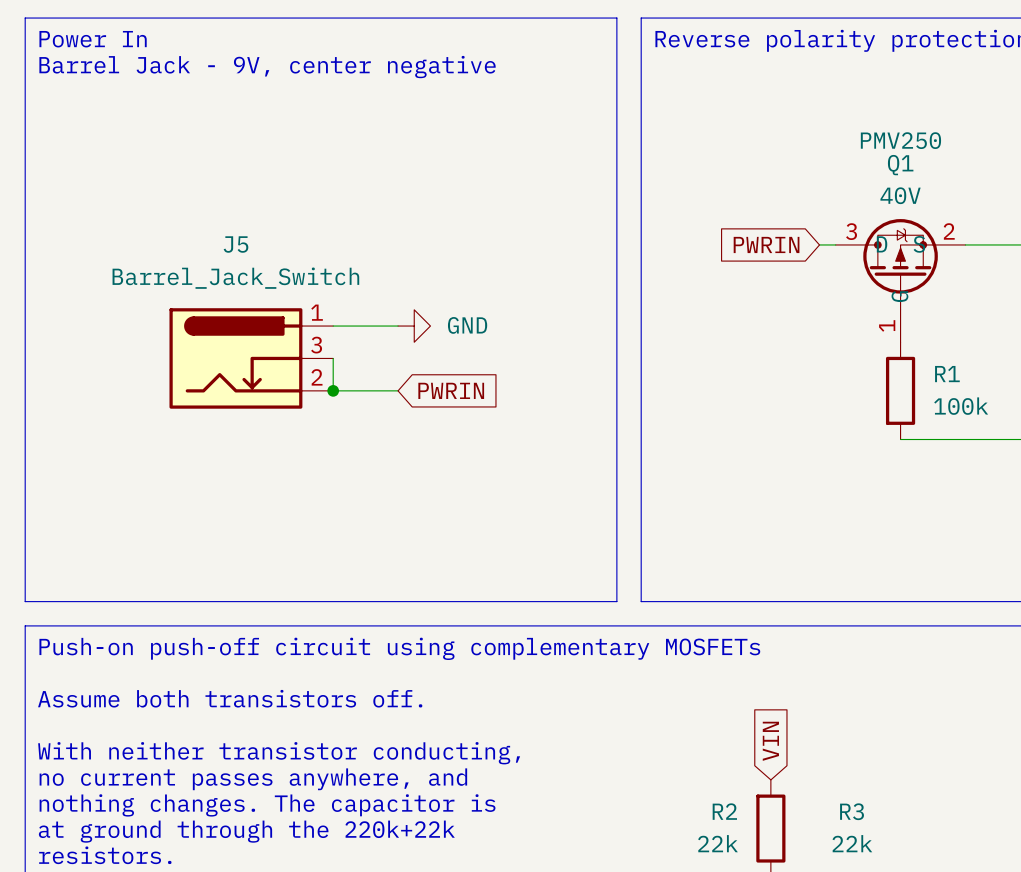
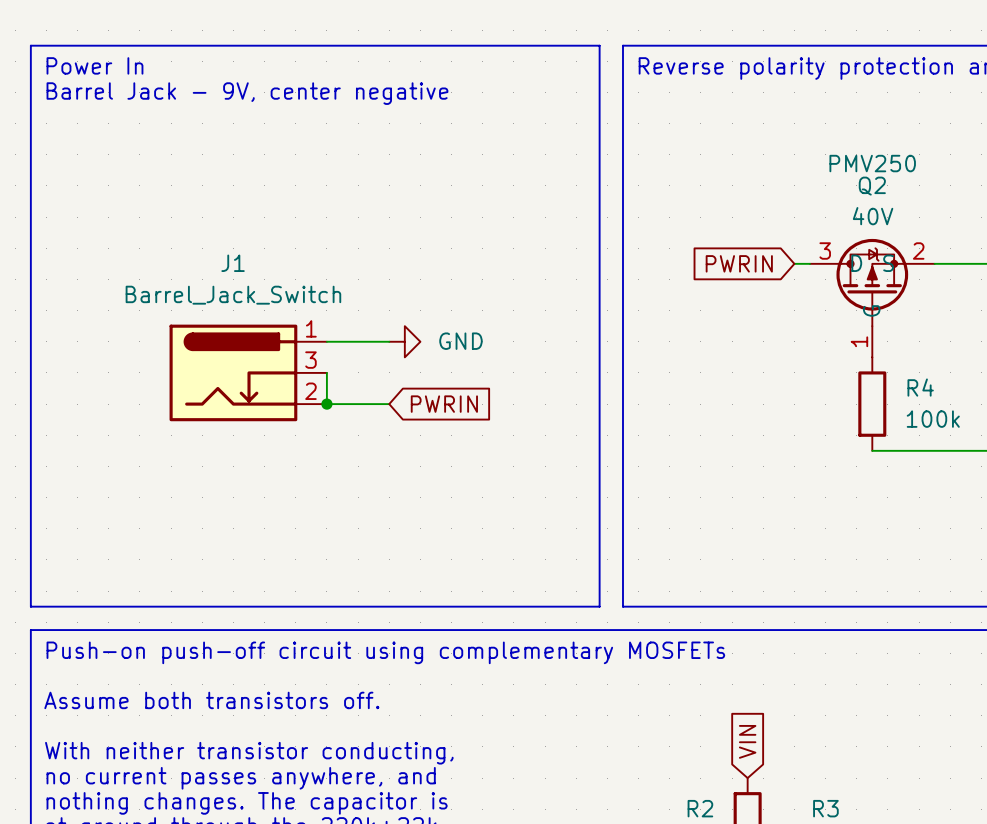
Q1 name: Q1 (900, 165) -> Q2 (872, 186)
J5 name: J5 (236, 244) -> J1 (233, 263)
R1 name: R1 (947, 374) -> R4 (920, 387)

